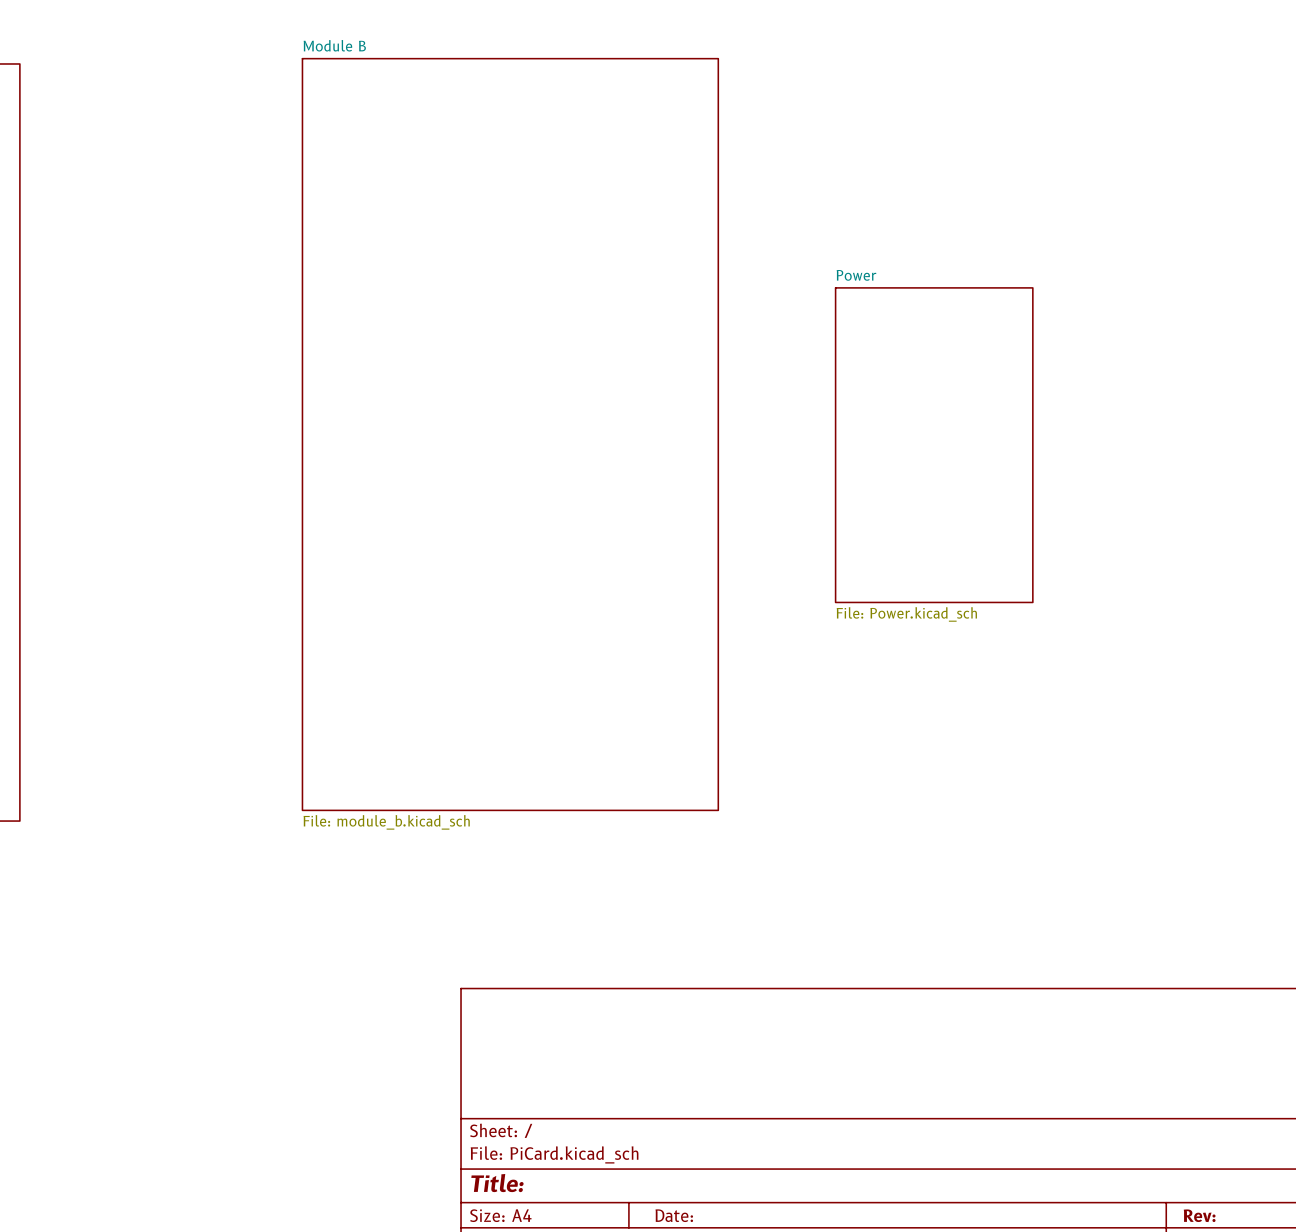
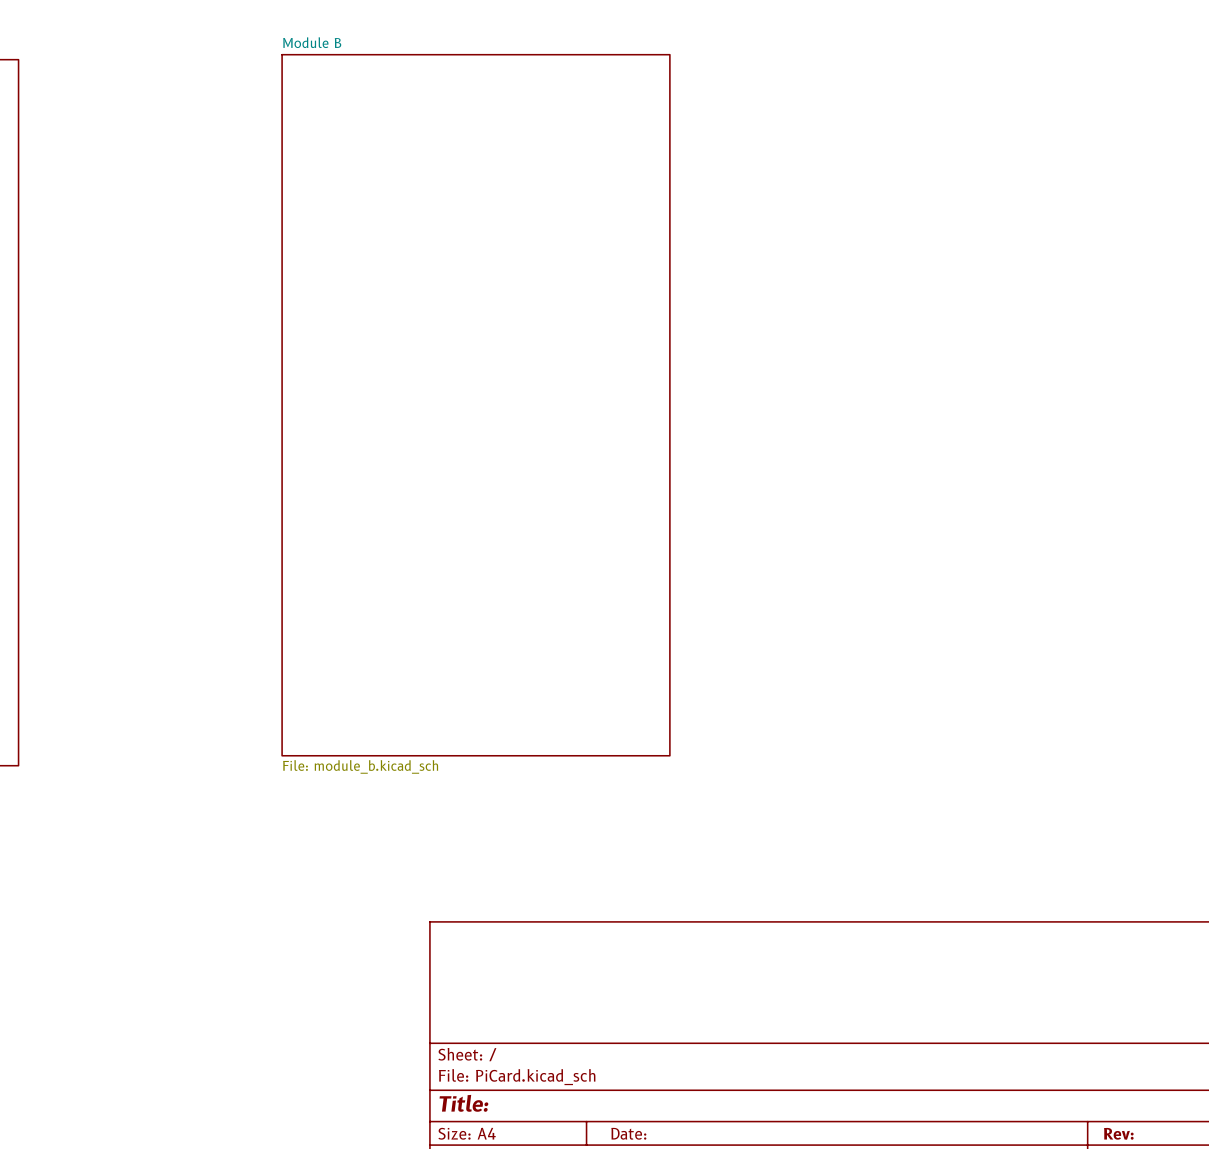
sheet Power: File: Power.kicad_sch (934, 445) -> none

